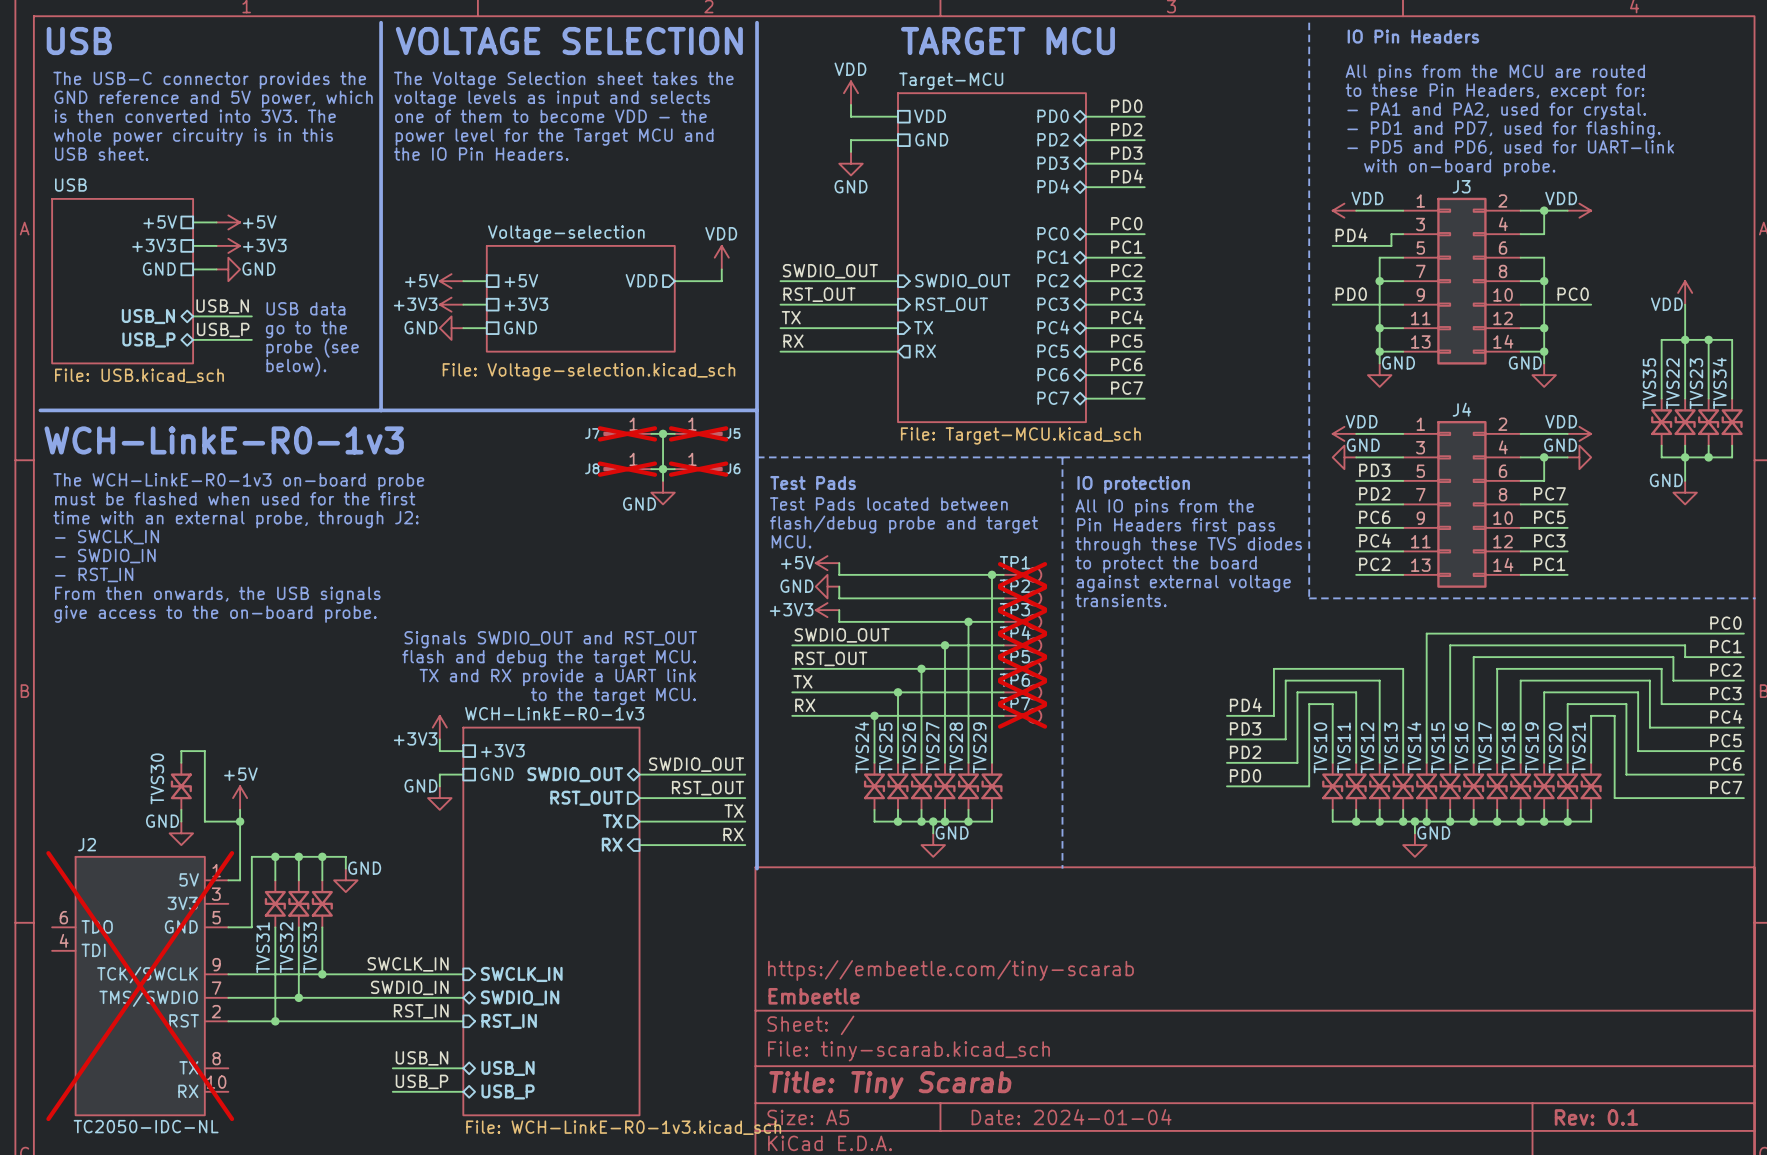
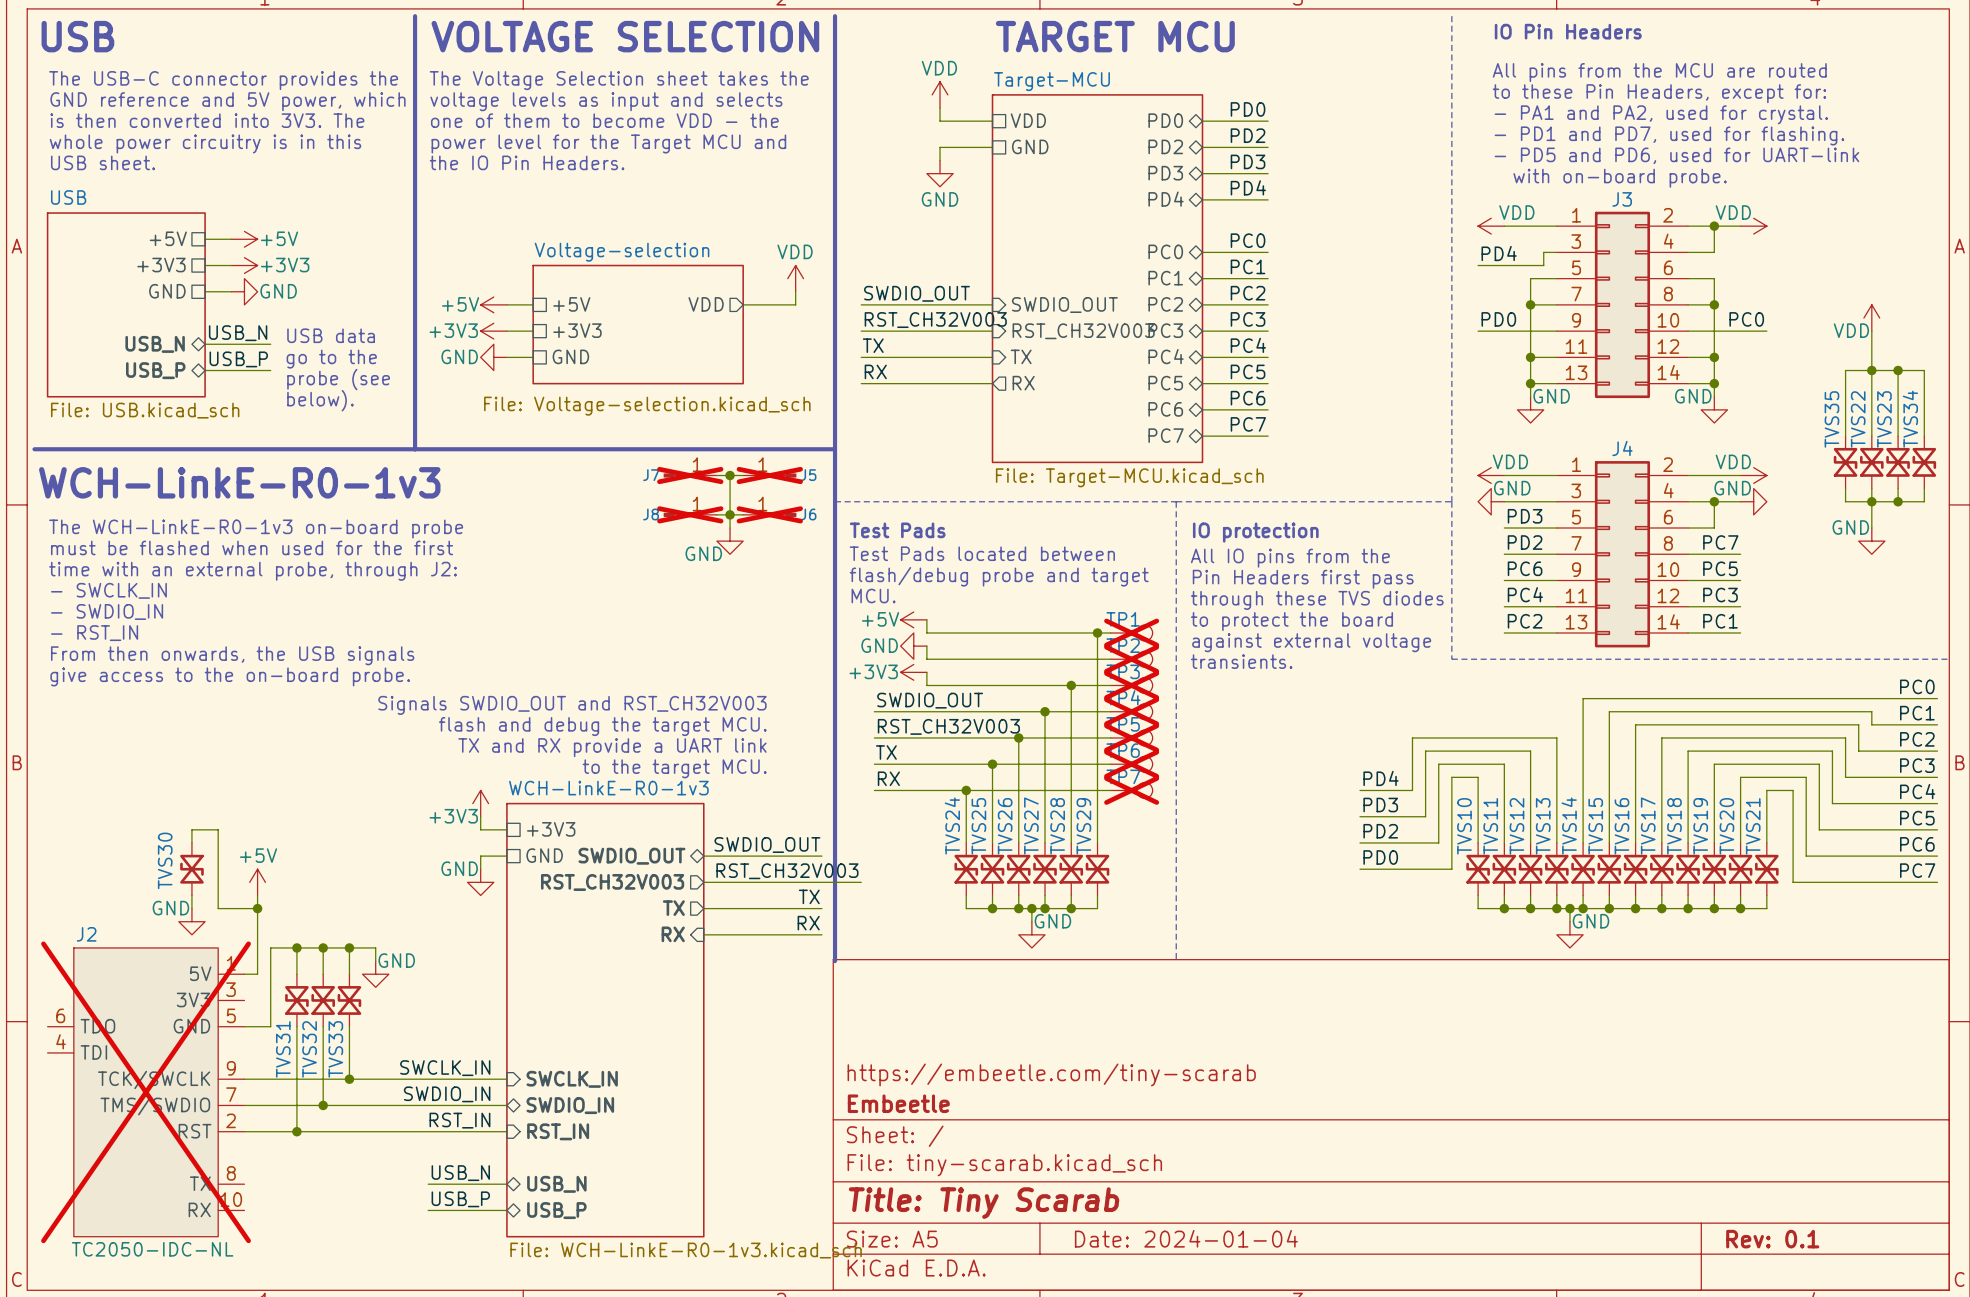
label: RST_OUT (819, 294) -> RST_CH32V003 (935, 320)
sheet pin: RST_OUT (951, 304) -> RST_CH32V003 (1083, 331)
text: Signals SWDIO_OUT and RST_OUT (550, 639) -> Signals SWDIO_OUT and RST_CH32V003 (572, 705)
label: RST_OUT (831, 658) -> RST_CH32V003 (948, 726)
label: RST_OUT (707, 788) -> none
label: none -> RST_CH32V003 (787, 871)
sheet pin: RST_OUT (586, 798) -> RST_CH32V003 (612, 882)
wire: none -> (821, 882) (861, 882)

